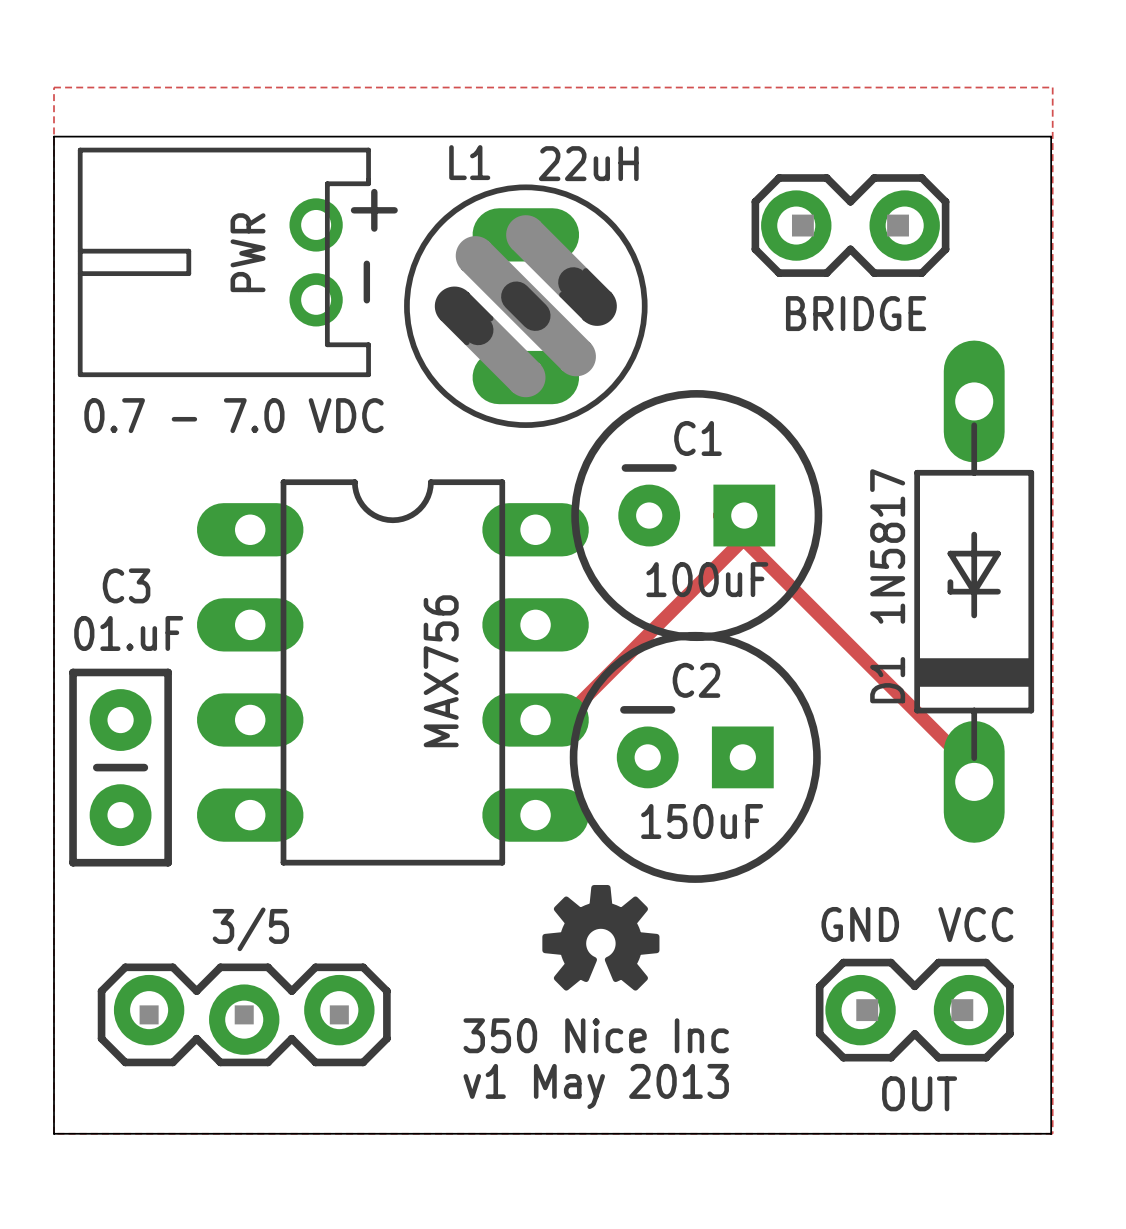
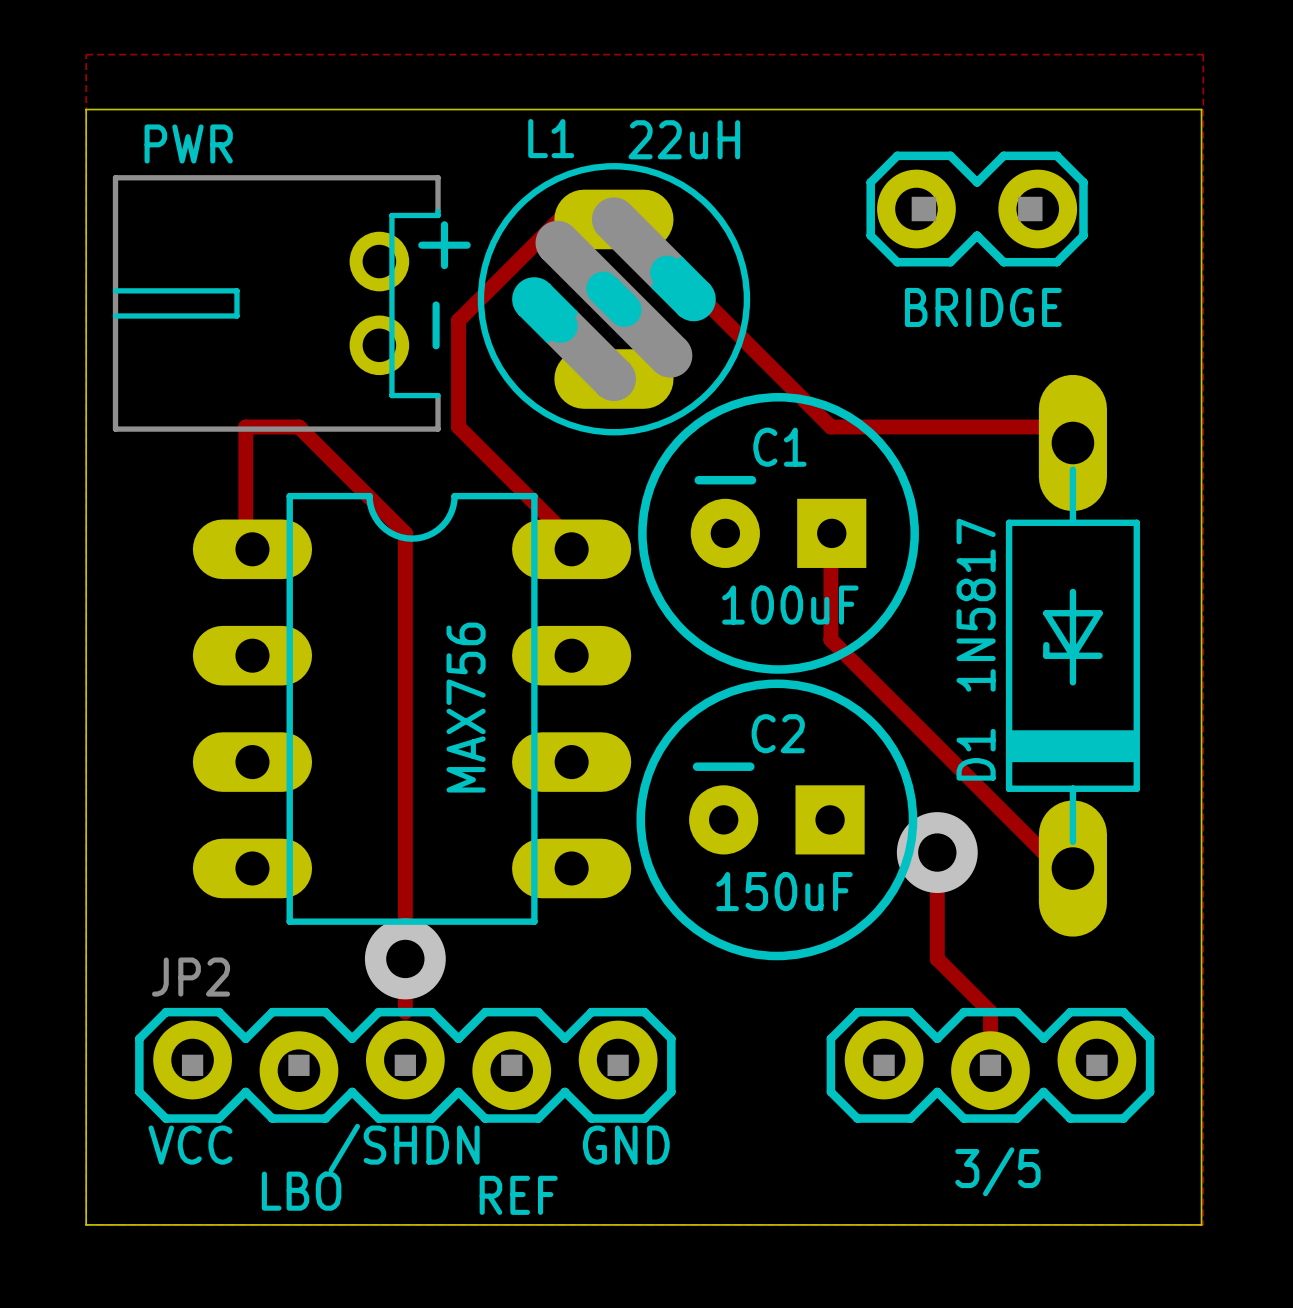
PWR: (224, 262) -> none
PWR: none -> (276, 303)
text: 0.7 - 7.0 VDC (234, 415) -> none
track: none -> (1072, 442) (1043, 426) (830, 426) (618, 214) (613, 219) (564, 214) (458, 320) (458, 426) (564, 533) (571, 549)
C1 position: (696, 515) -> (778, 533)
track: (719, 515) (957, 753) (974, 781) -> (830, 533) (830, 639) (1043, 852) (1072, 868)
track: (720, 515) (767, 515) (577, 705) (535, 719) -> none
track: none -> (252, 549) (245, 533) (245, 426) (298, 426) (405, 533) (405, 1012)
D1 position: (974, 591) -> (1072, 655)
MAX756 position: (392, 672) -> (412, 708)
C2 position: (695, 757) -> (776, 819)
C3: 01.uF (120, 767) -> none
track: none -> (937, 852) (937, 958) (990, 1012) (990, 1070)
via: none -> (937, 852)
drawing: [542, 884, 660, 991] -> none
via: none -> (405, 958)
text position: GND (860, 924) -> GND (626, 1145)
text position: VCC (975, 924) -> VCC (190, 1145)
3/5 name position: 3/5 (250, 929) -> 3/5 (997, 1171)
JP2: none -> (405, 1065)
OUT: (914, 1010) -> none
3/5 position: (244, 1014) -> (990, 1065)
text: 350 Nice Inc (596, 1035) -> none
text: none -> /SHDN (404, 1148)
text: v1 May 2013 (596, 1086) -> none
text: none -> LBO (301, 1191)
text: none -> REF (518, 1195)

